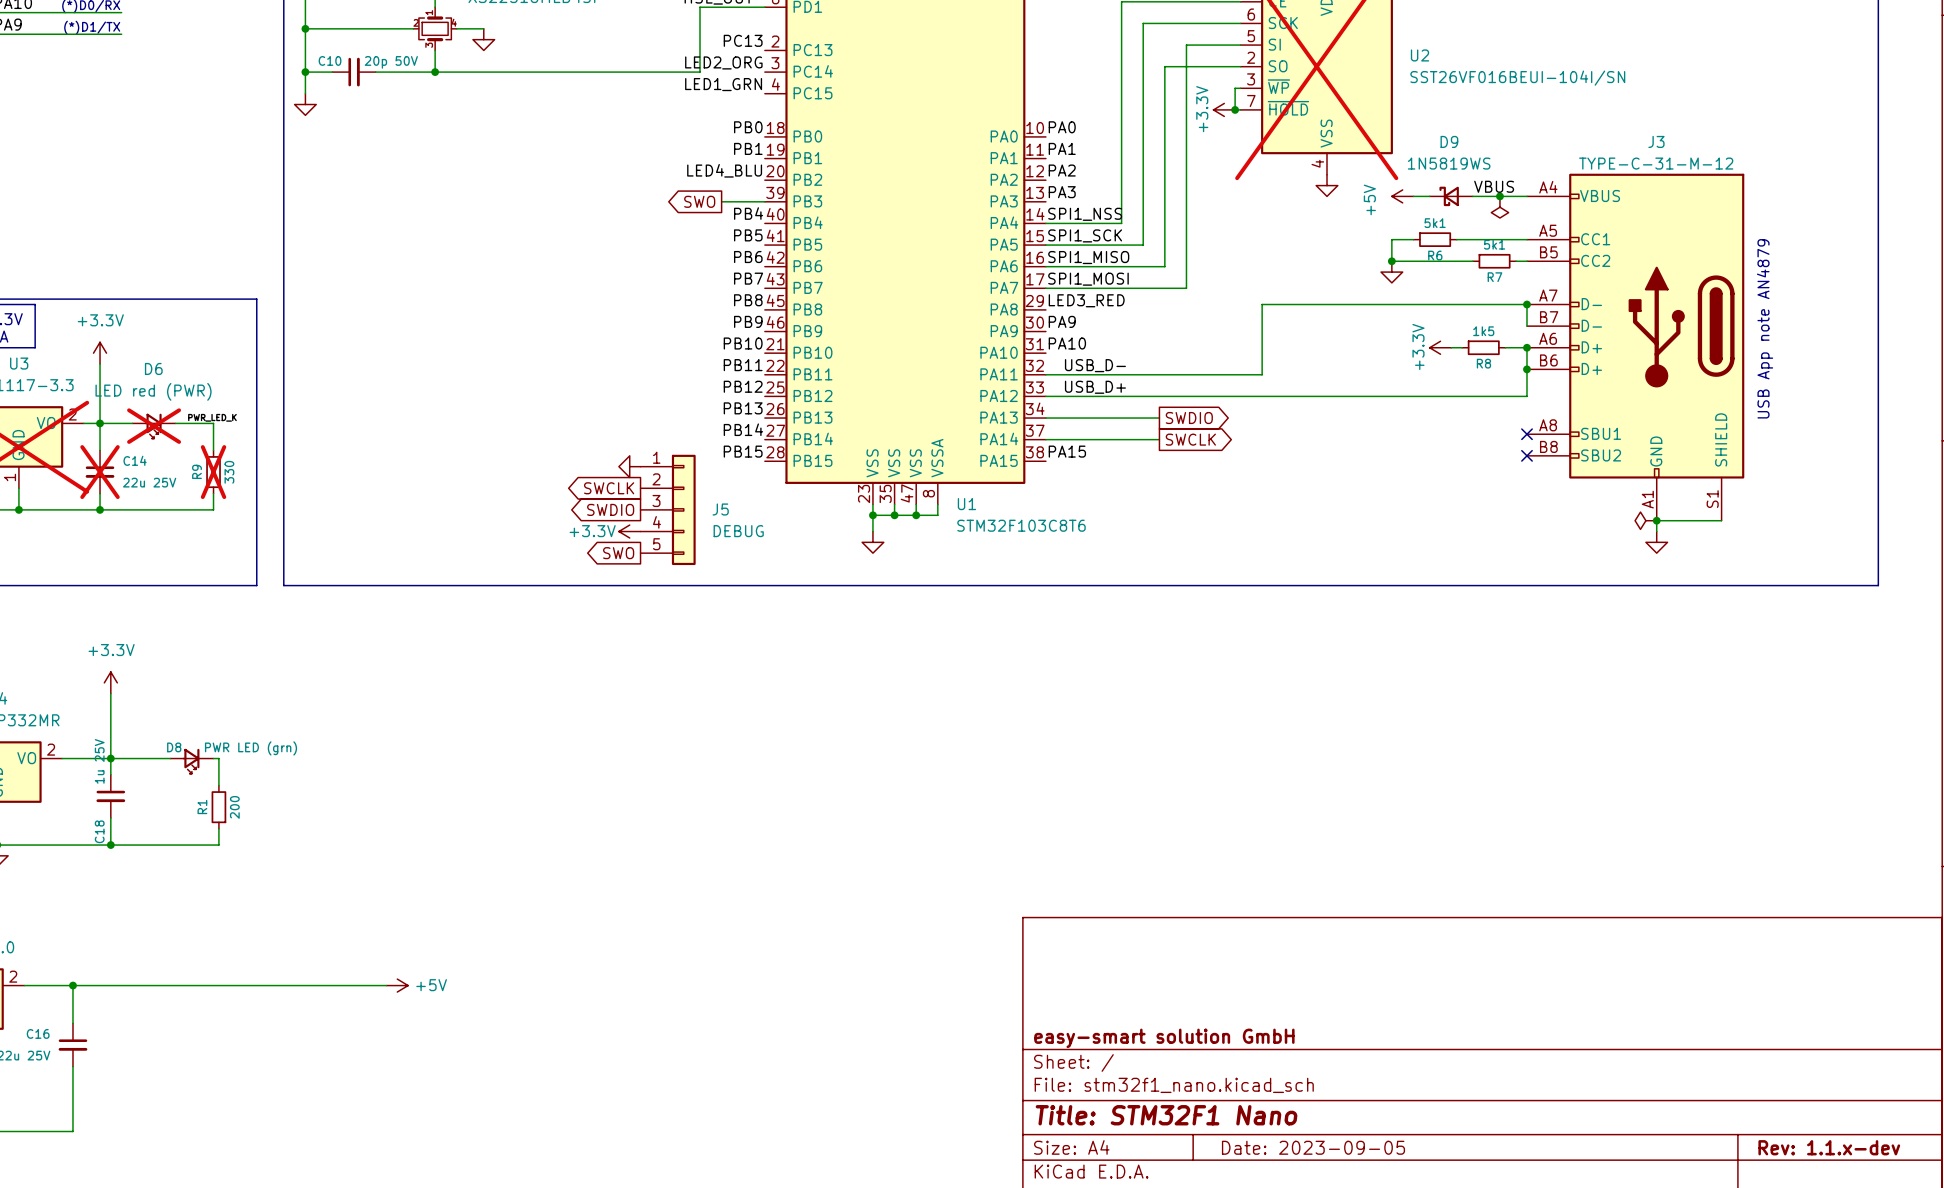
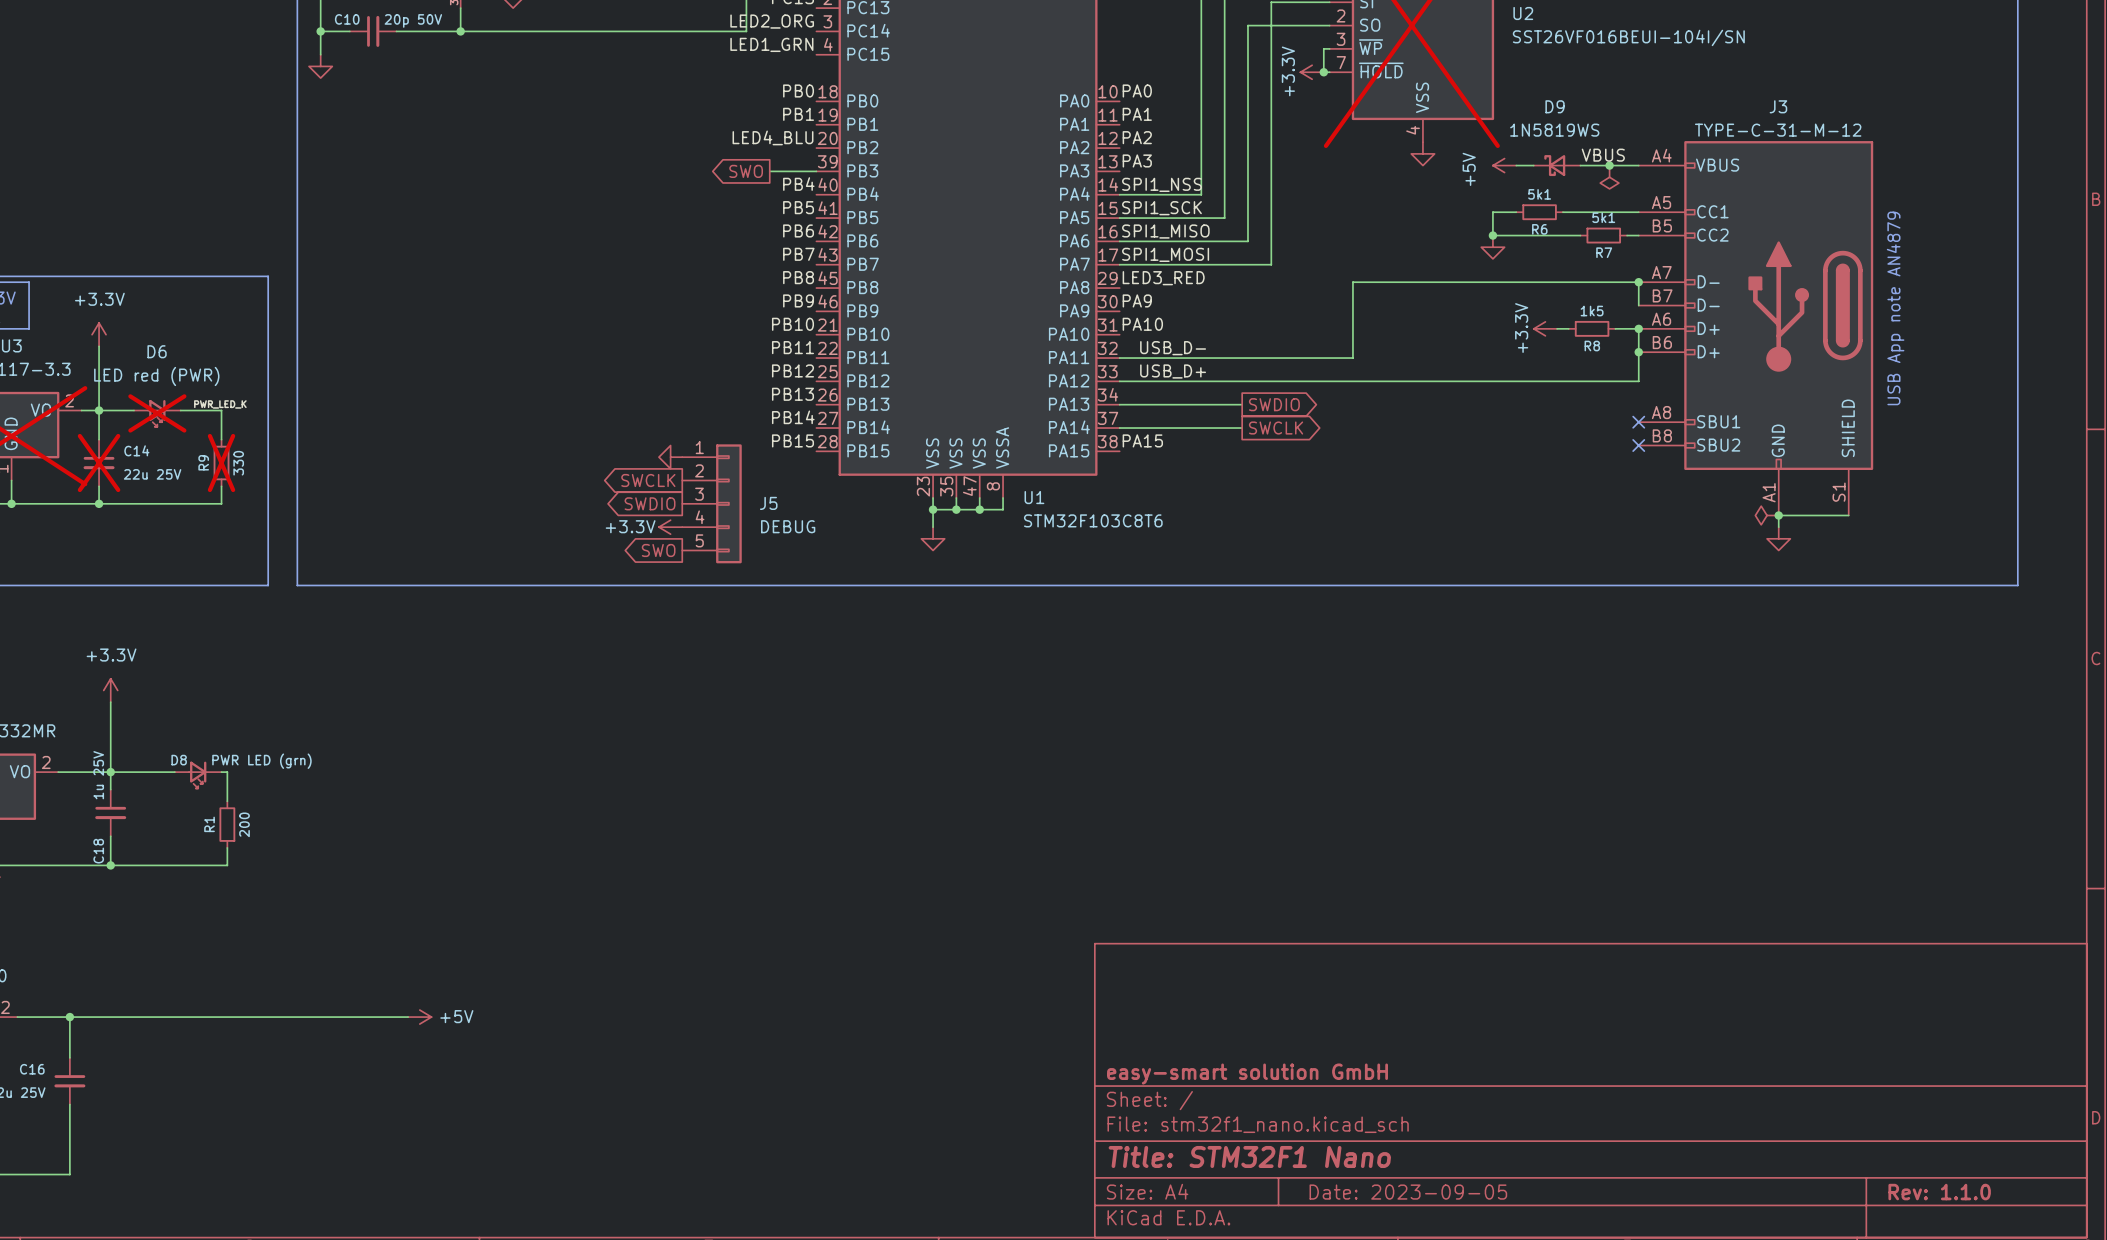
title block: Rev: 1.1.x-dev (1829, 1147) -> Rev: 1.1.0 (1939, 1192)

